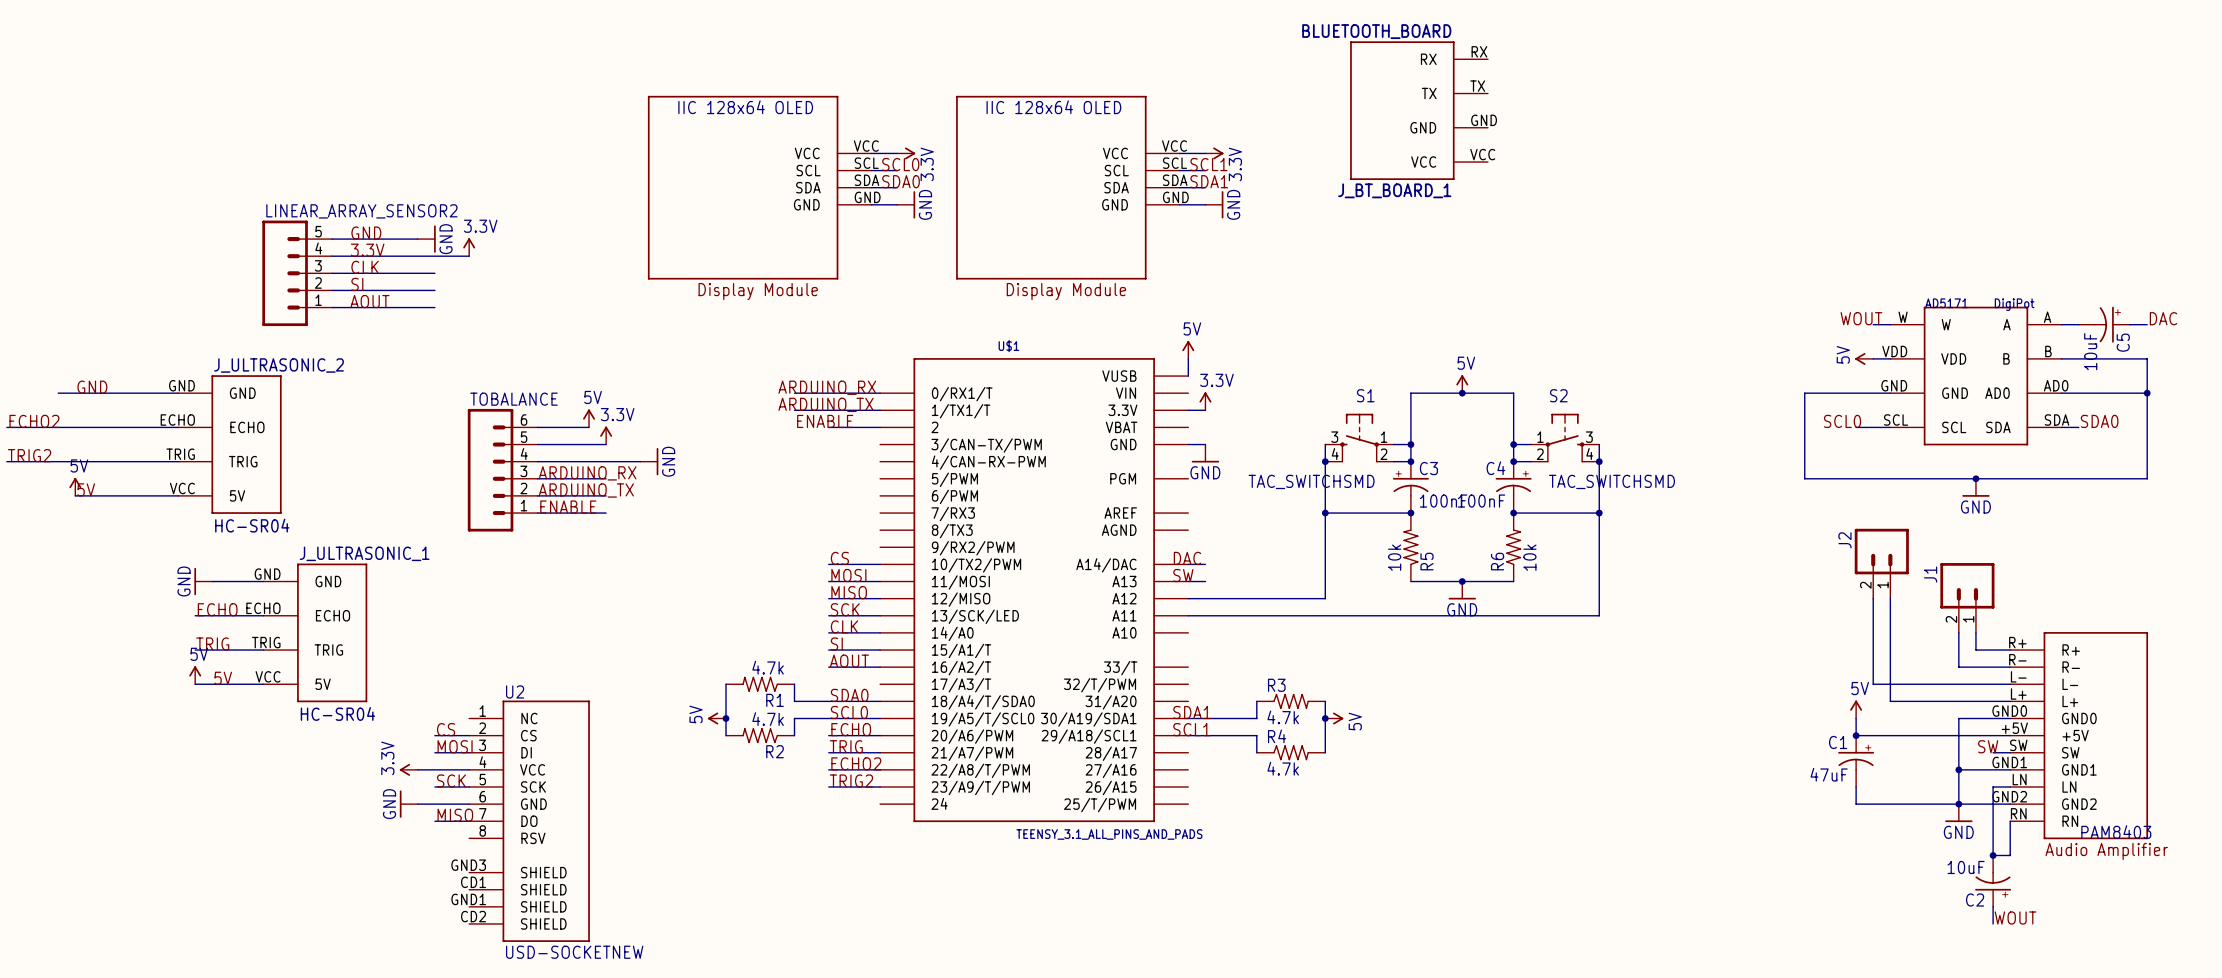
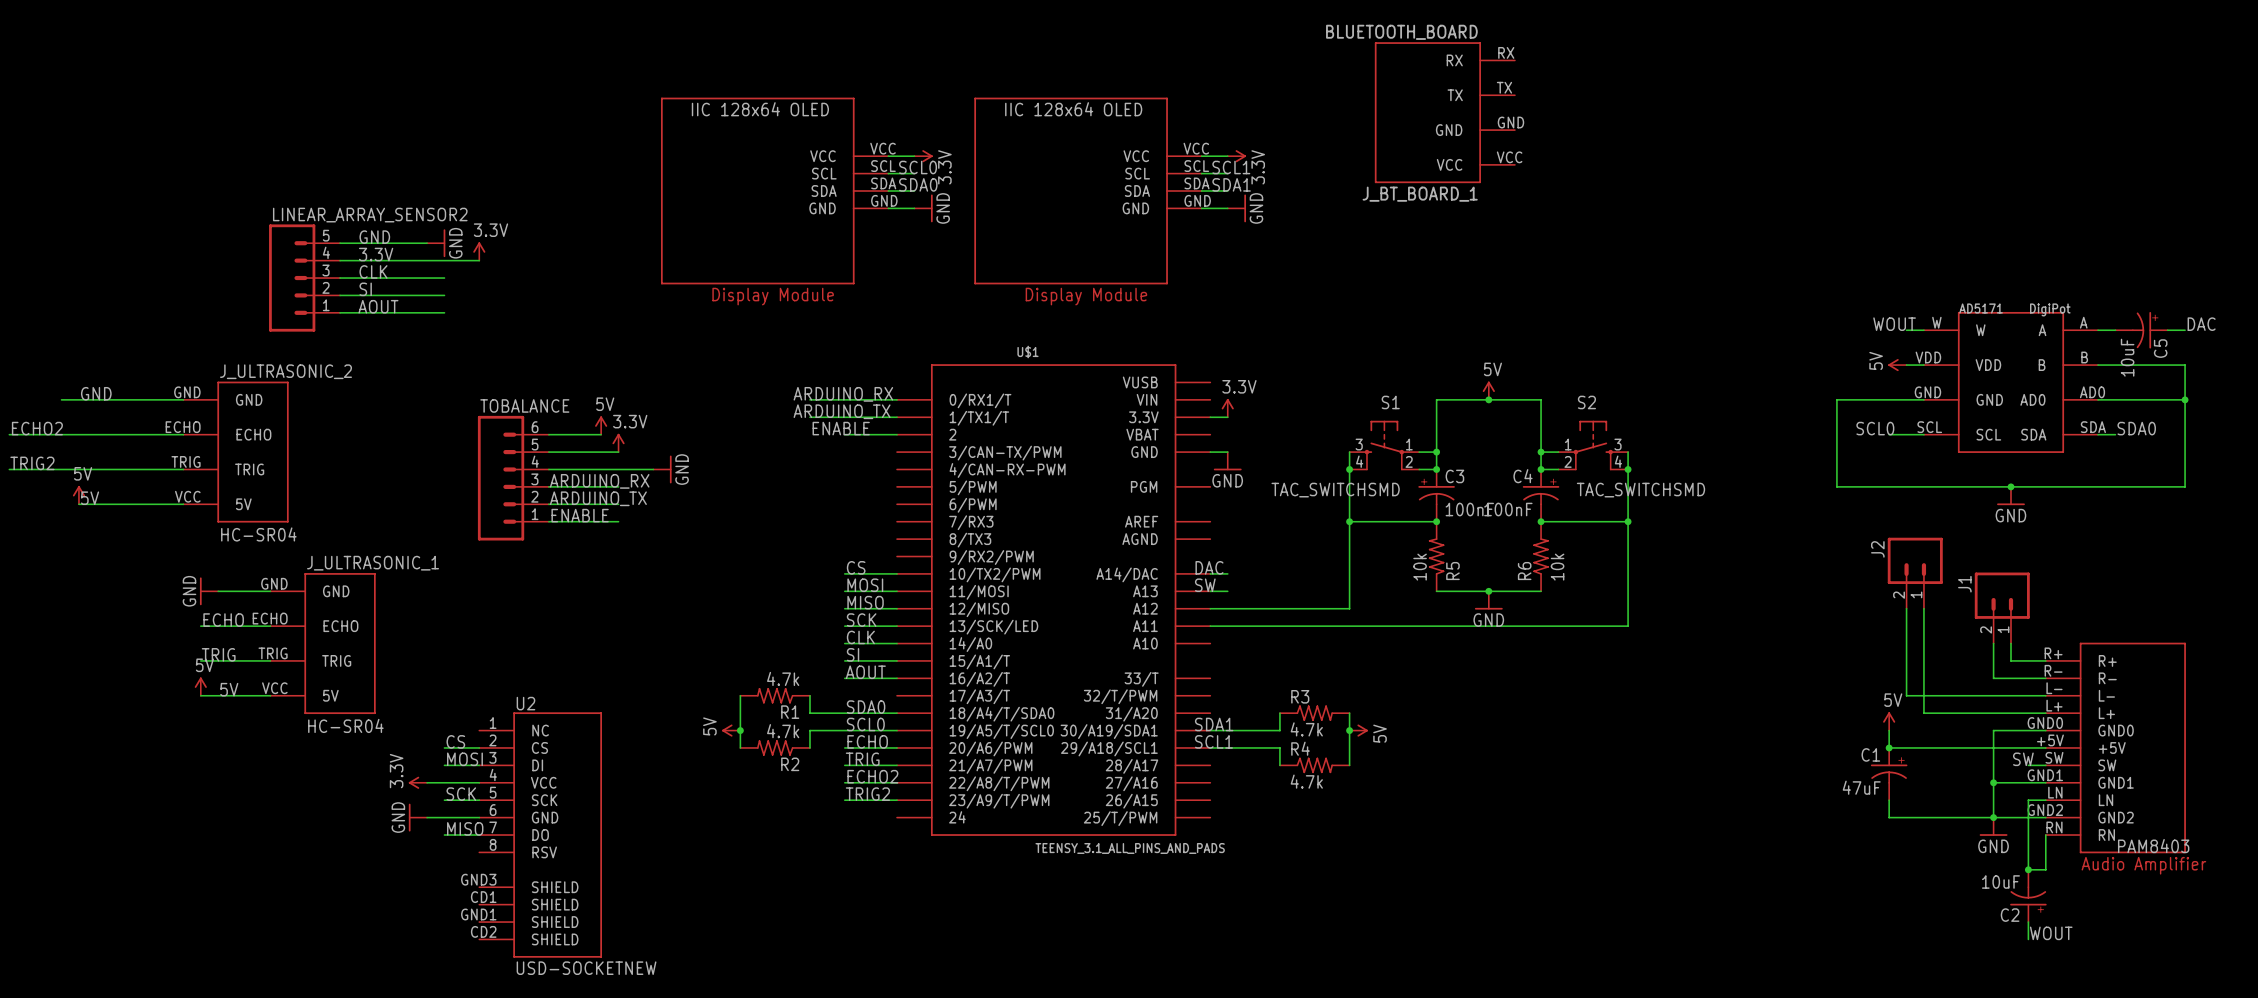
power symbol: 5V (1188, 349) -> none
wire: (1188, 358) (1188, 376) -> none

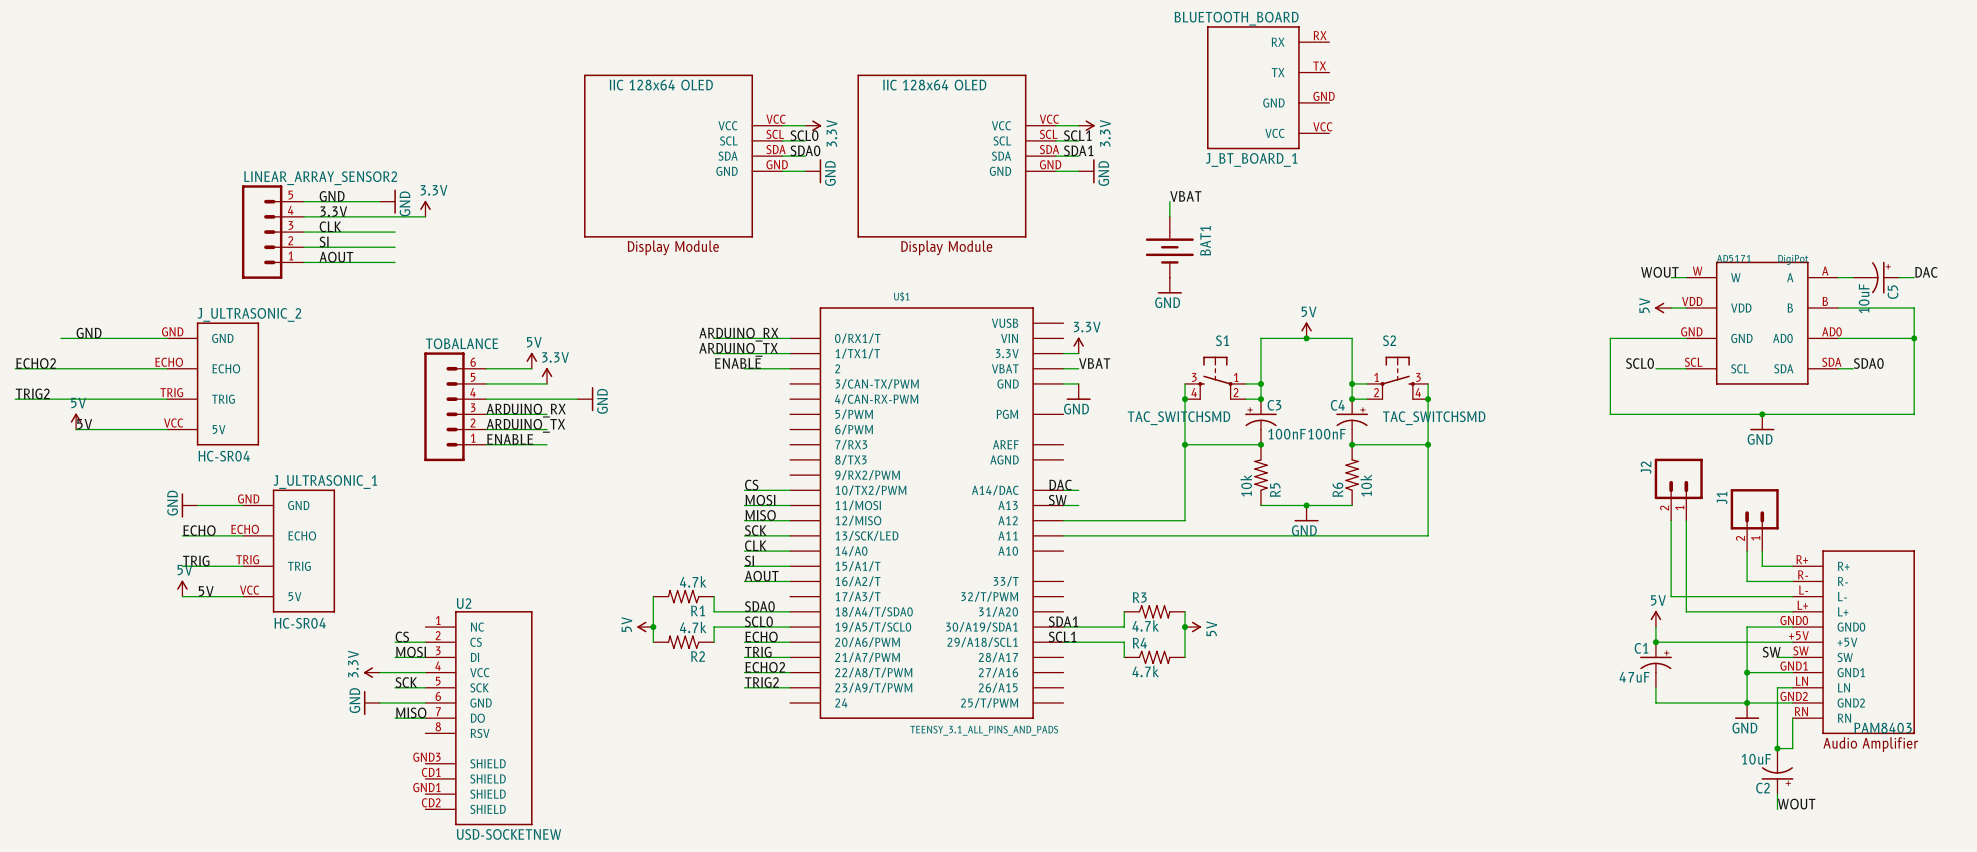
label: none -> VBAT (1185, 196)
wire: none -> (1169, 201) (1169, 216)
BAT1: none -> (1169, 247)
power symbol: none -> GND (1169, 285)
label: none -> VBAT (1094, 363)
wire: none -> (1063, 368) (1078, 368)

